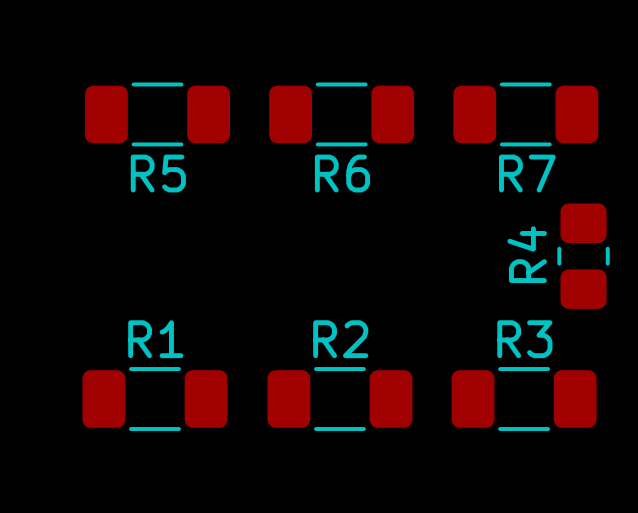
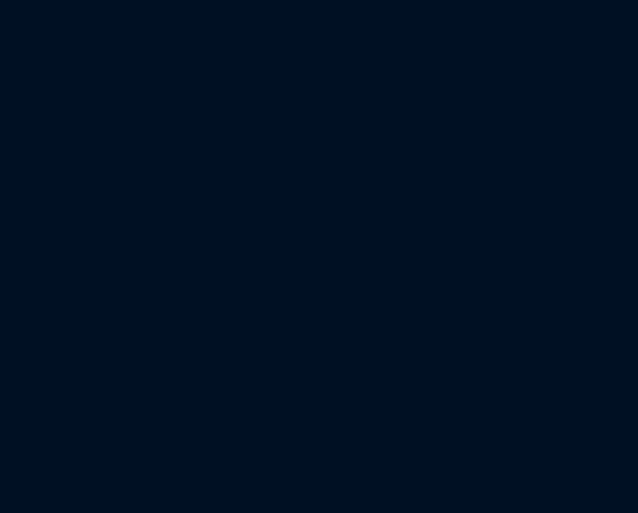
R5: (157, 114) -> none
R6: (341, 114) -> none
R7: (525, 114) -> none
R4: (583, 256) -> none
R1: (154, 399) -> none
R2: (339, 399) -> none
R3: (524, 399) -> none

